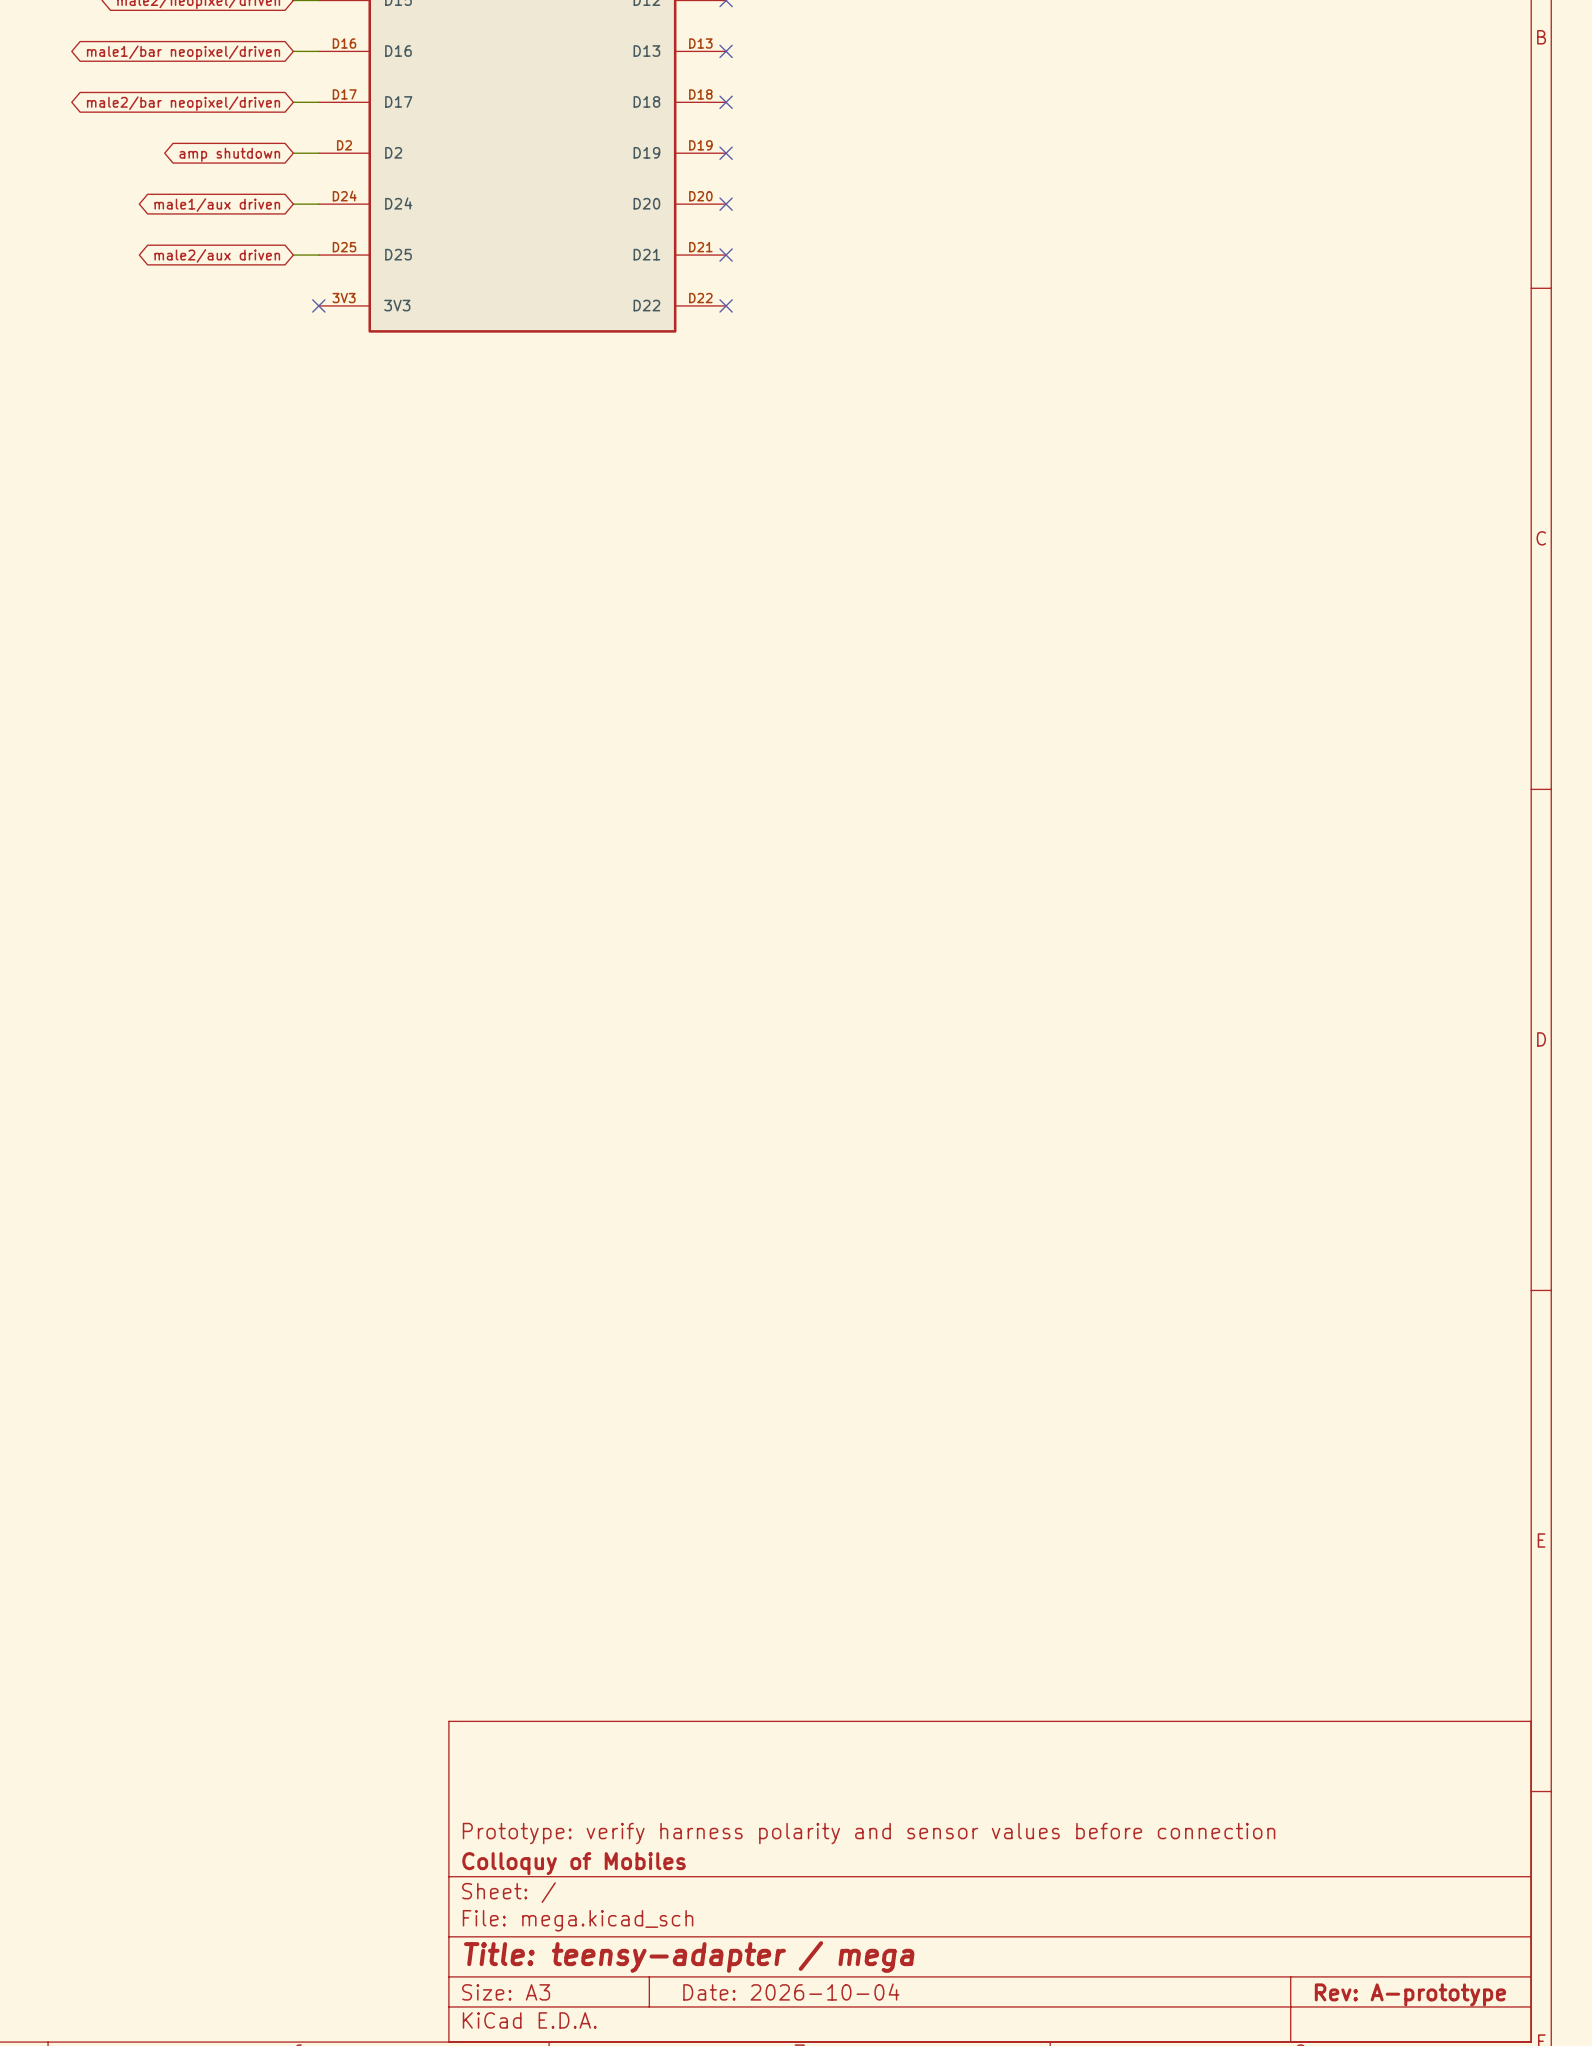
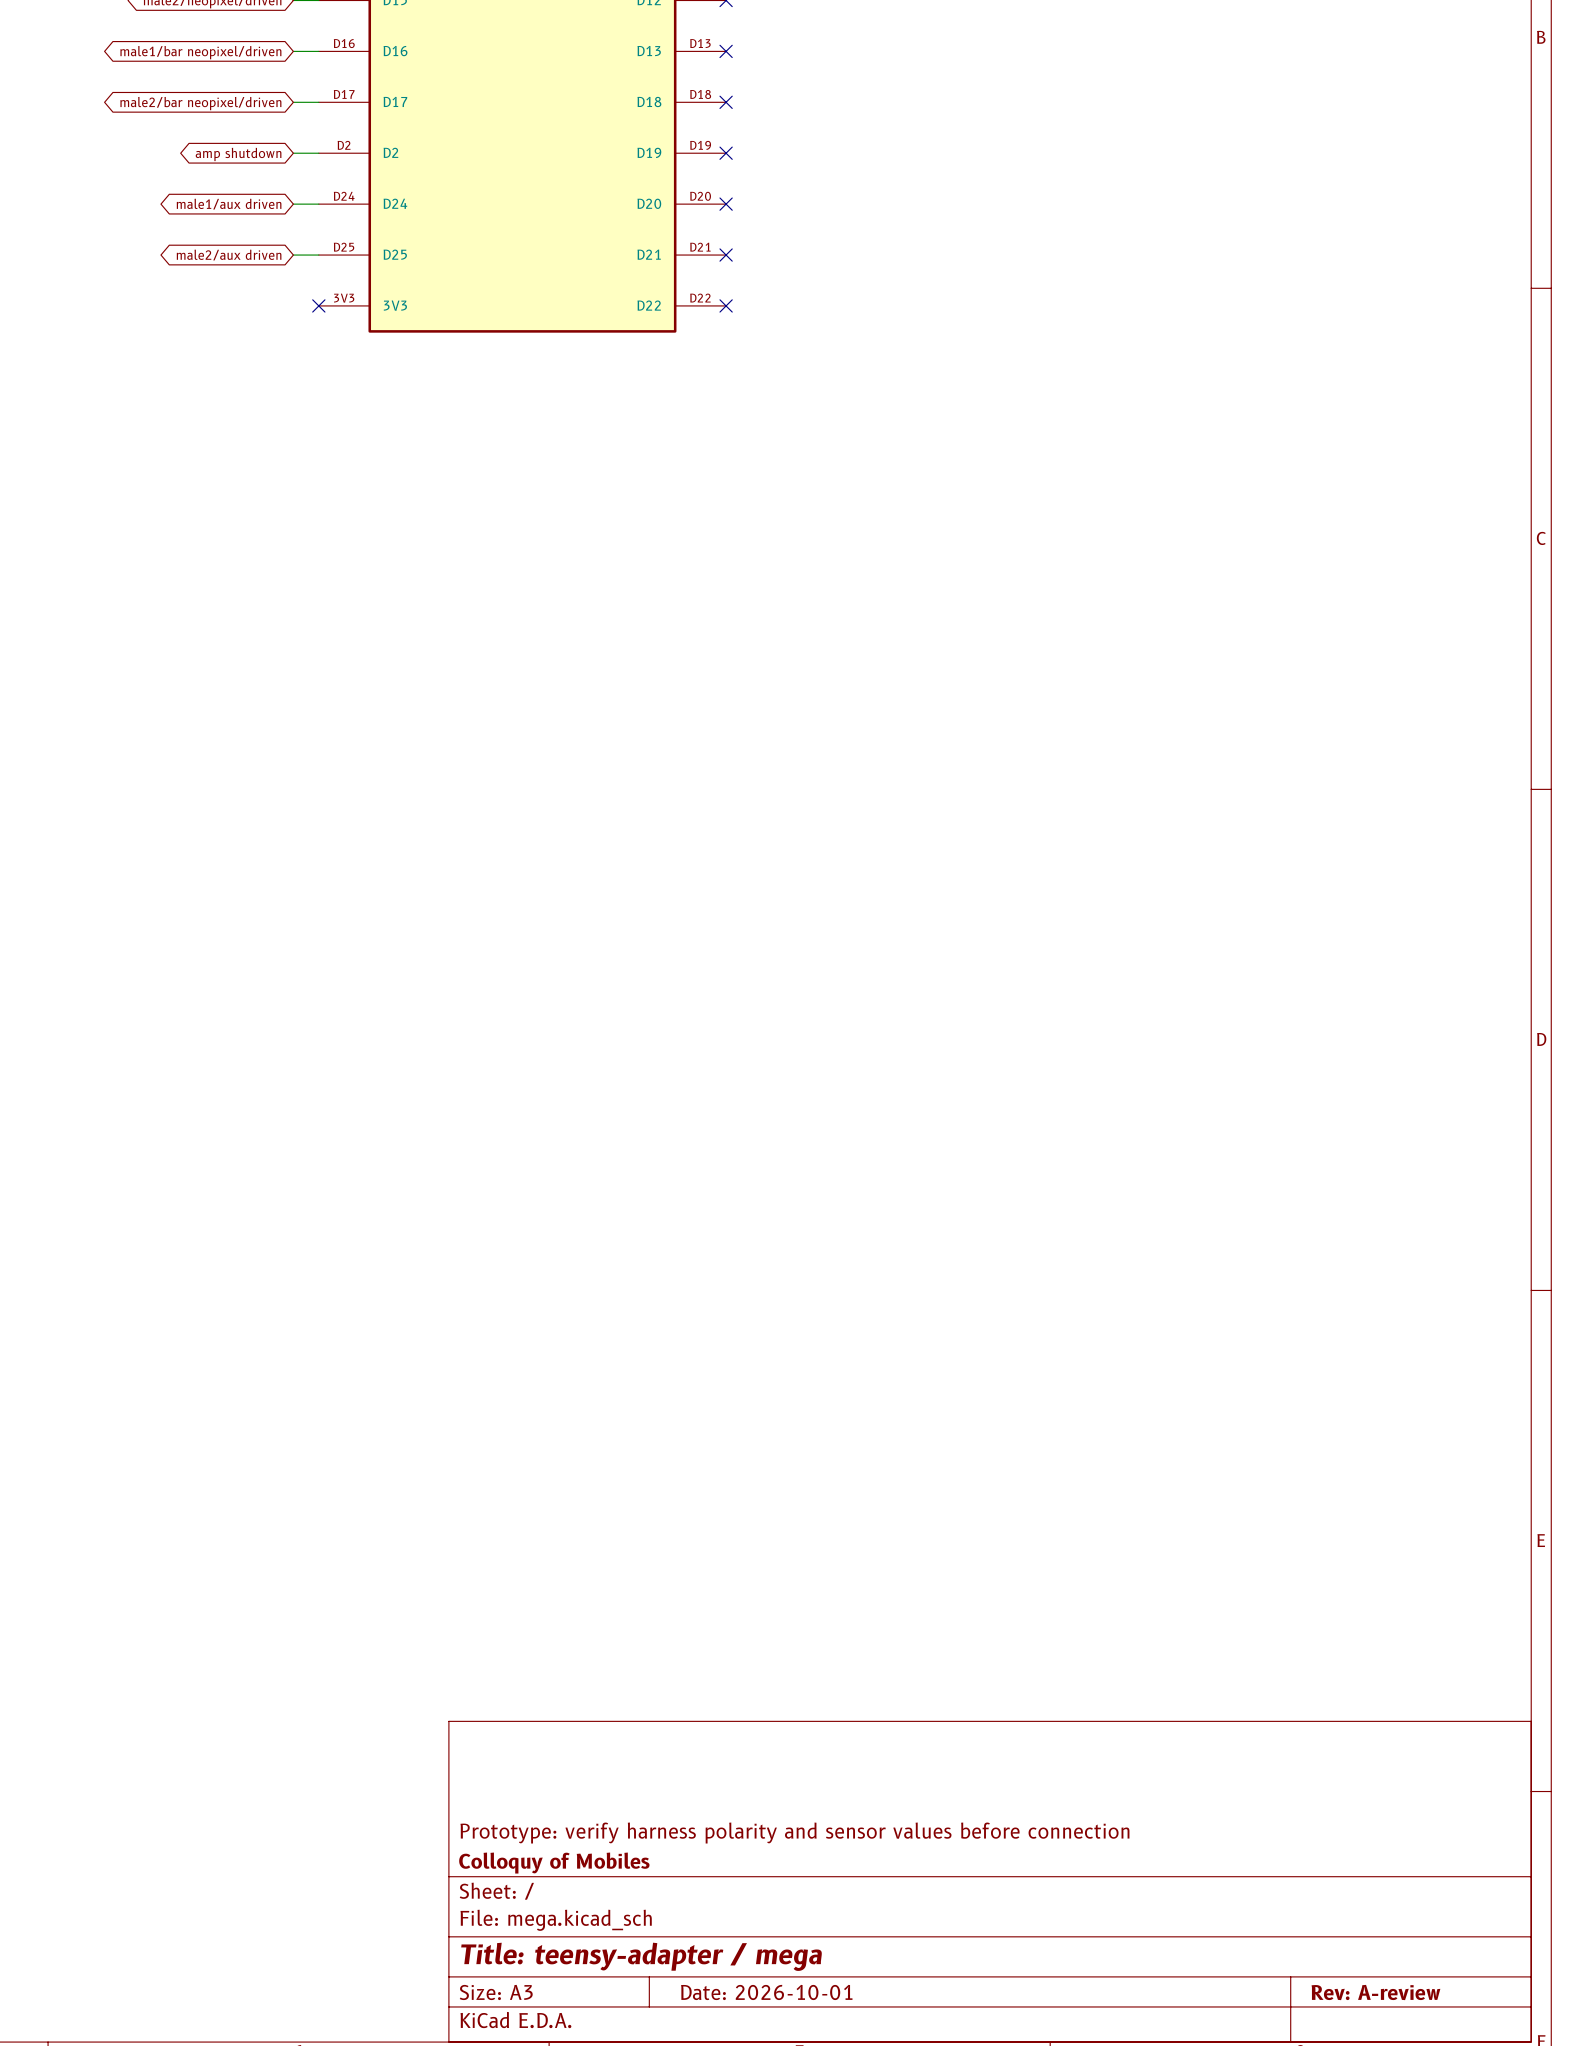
title block: Date: 2026-10-04 (791, 1992) -> Date: 2026-10-01 (766, 1992)
title block: Rev: A-prototype (1410, 1994) -> Rev: A-review (1375, 1992)

